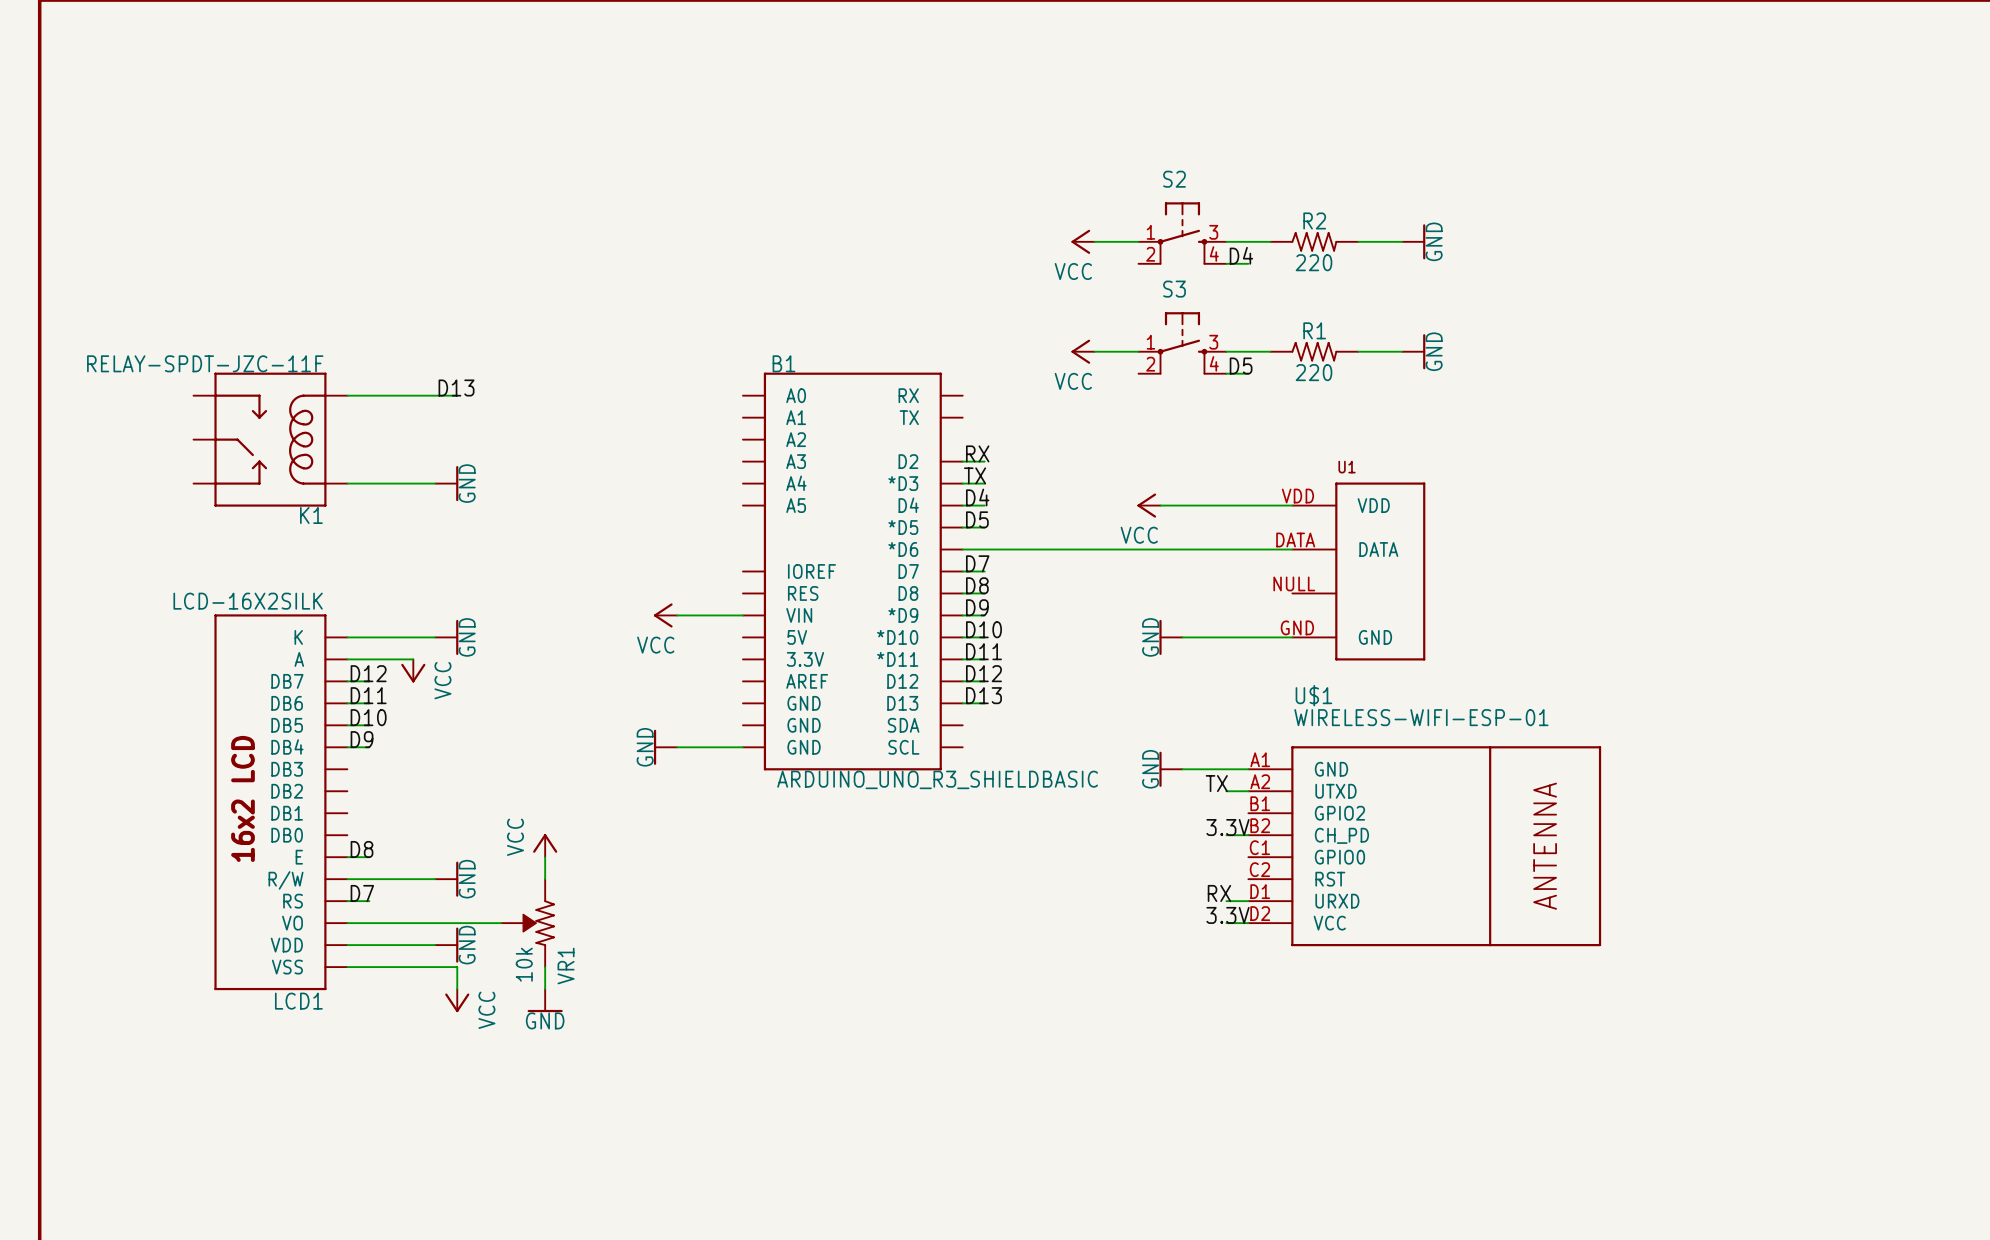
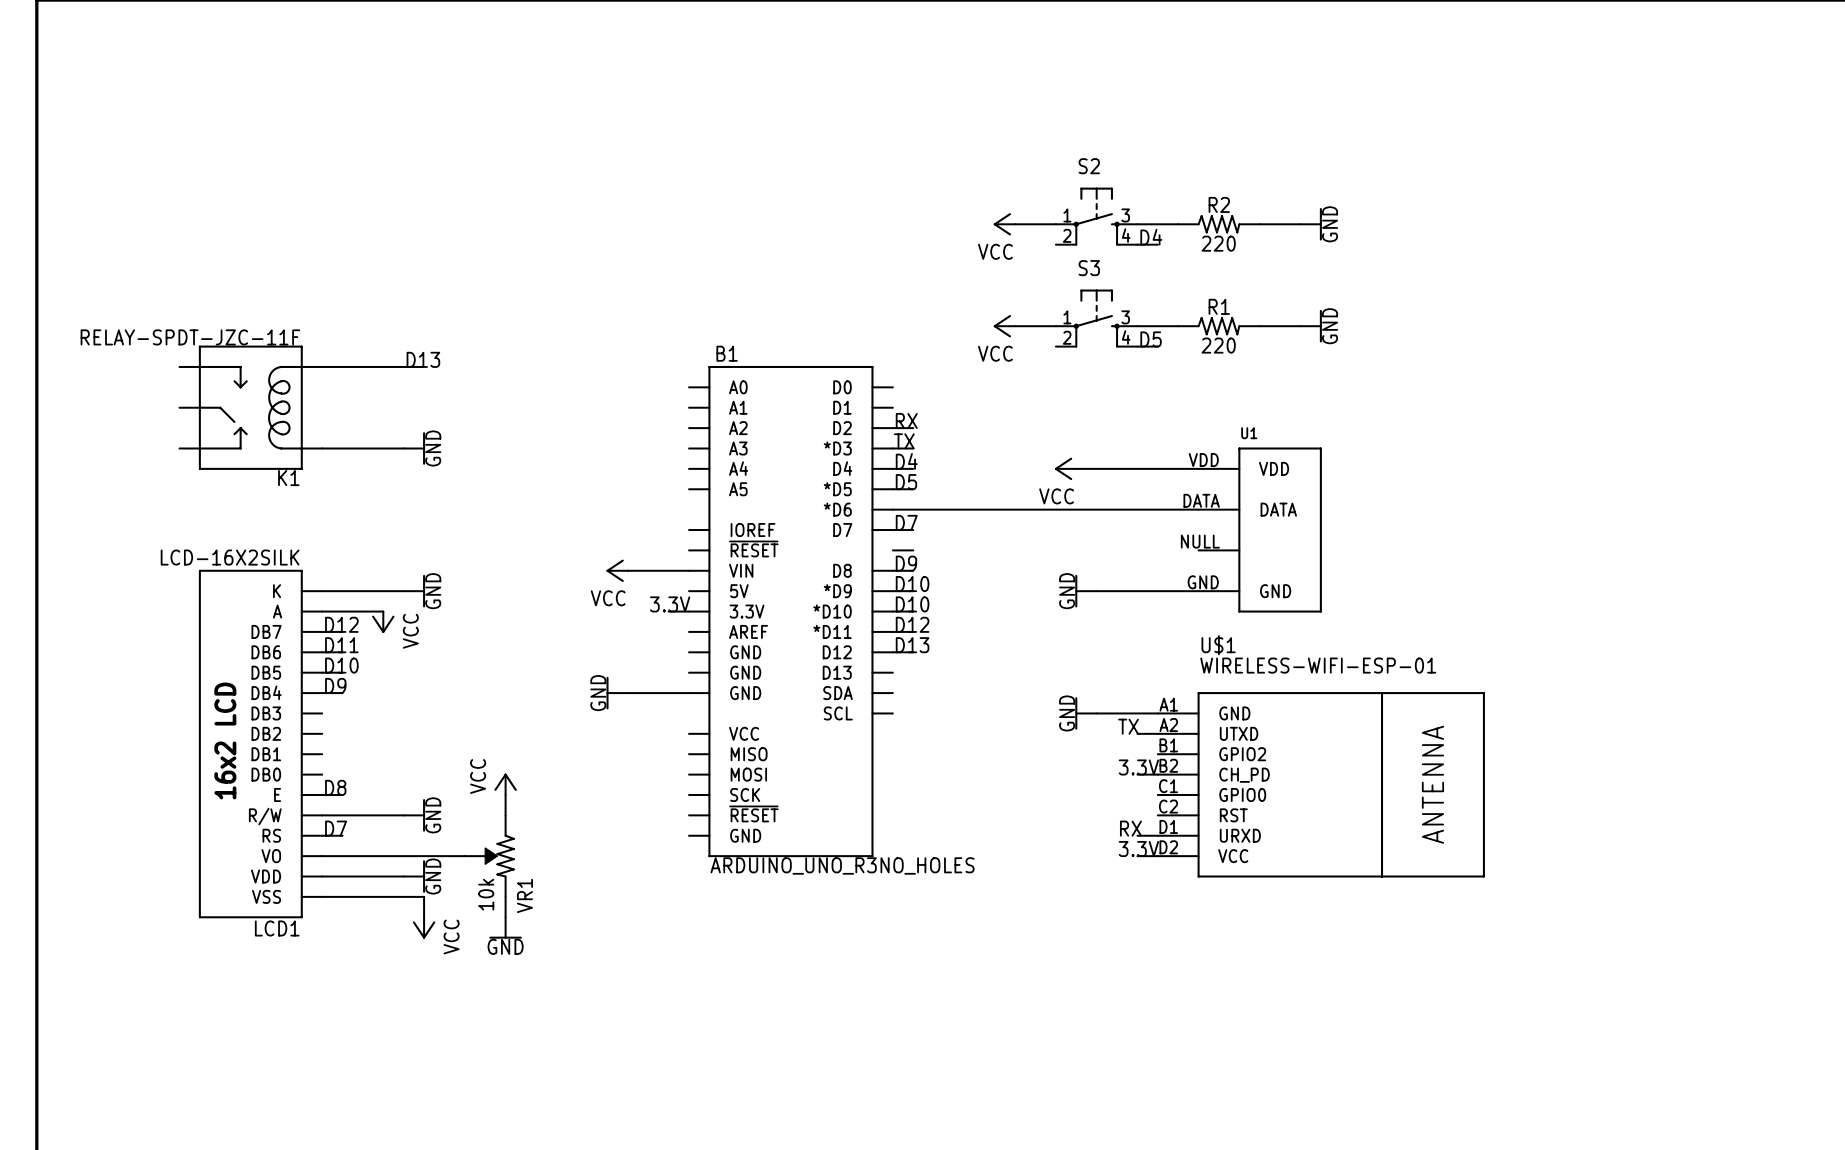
B1 name position: B1 (783, 363) -> B1 (727, 353)
B1 symbol: [742, 372, 963, 771] -> [689, 365, 893, 858]
label: D8 (977, 585) -> none
label: none -> 3.3V (670, 604)
label: D11 (983, 651) -> D10 (912, 604)
wire: none -> (668, 611) (689, 611)
B1 value: ARDUINO_UNO_R3_SHIELDBASIC (937, 779) -> ARDUINO_UNO_R3NO_HOLES (842, 865)

